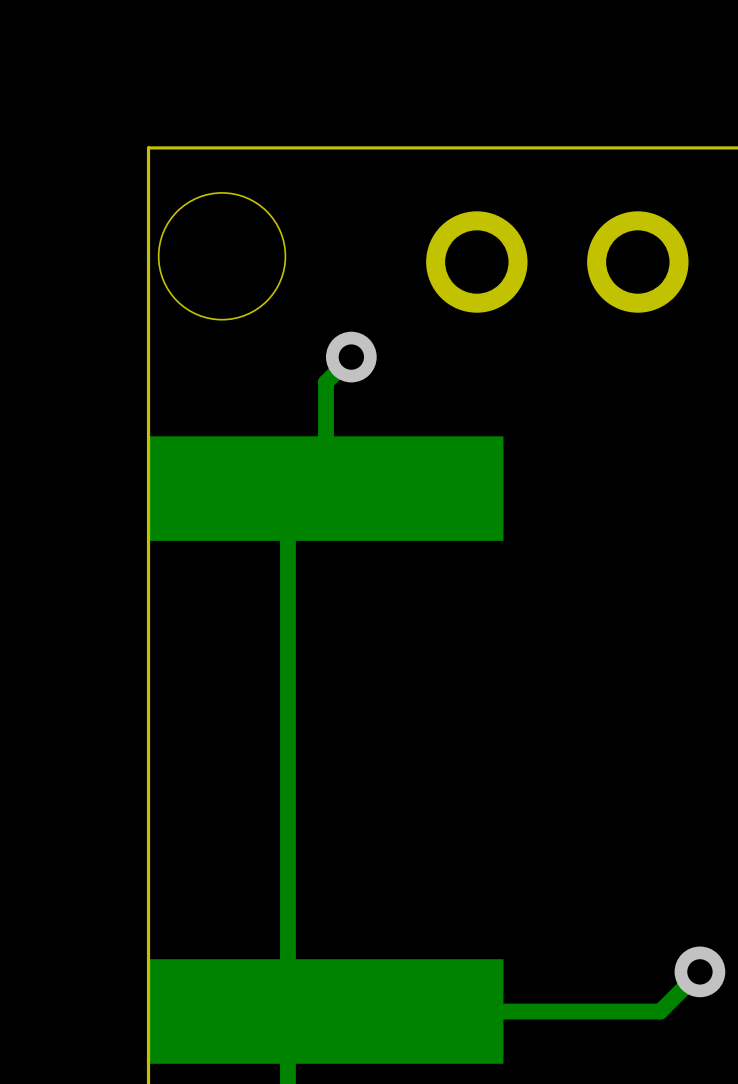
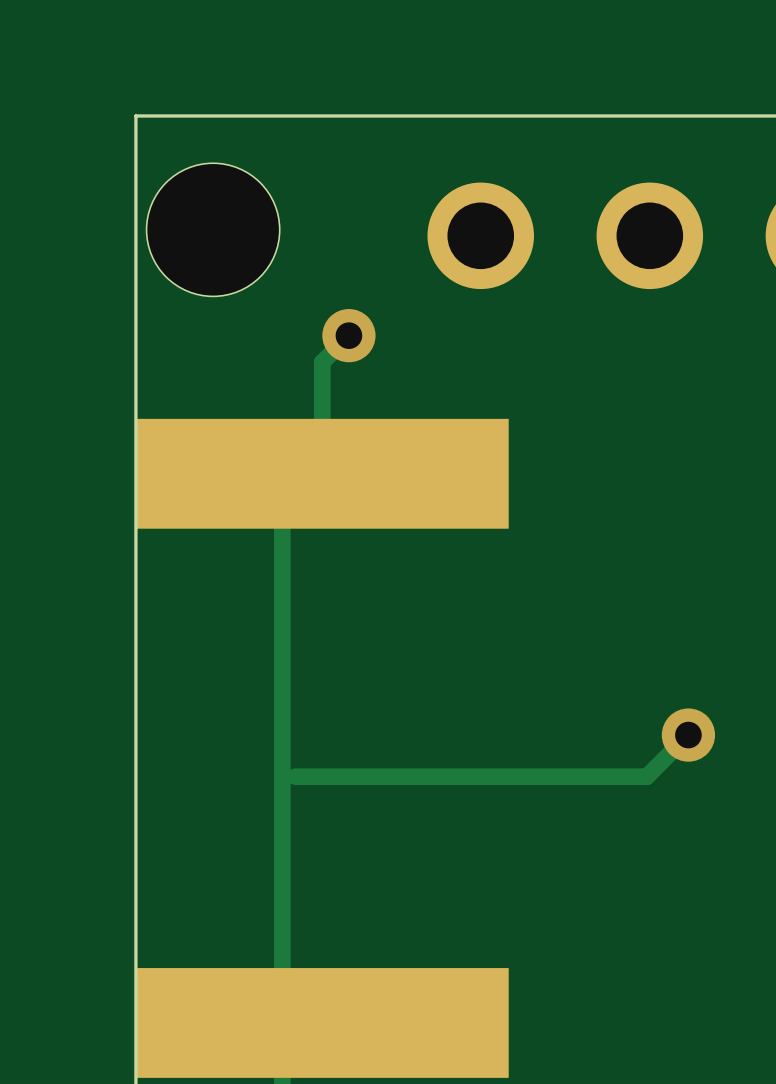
via: none -> (688, 735)
track: (699, 971) (660, 1011) (325, 1011) -> (688, 735) (646, 776) (295, 776)
via: (699, 971) -> none

